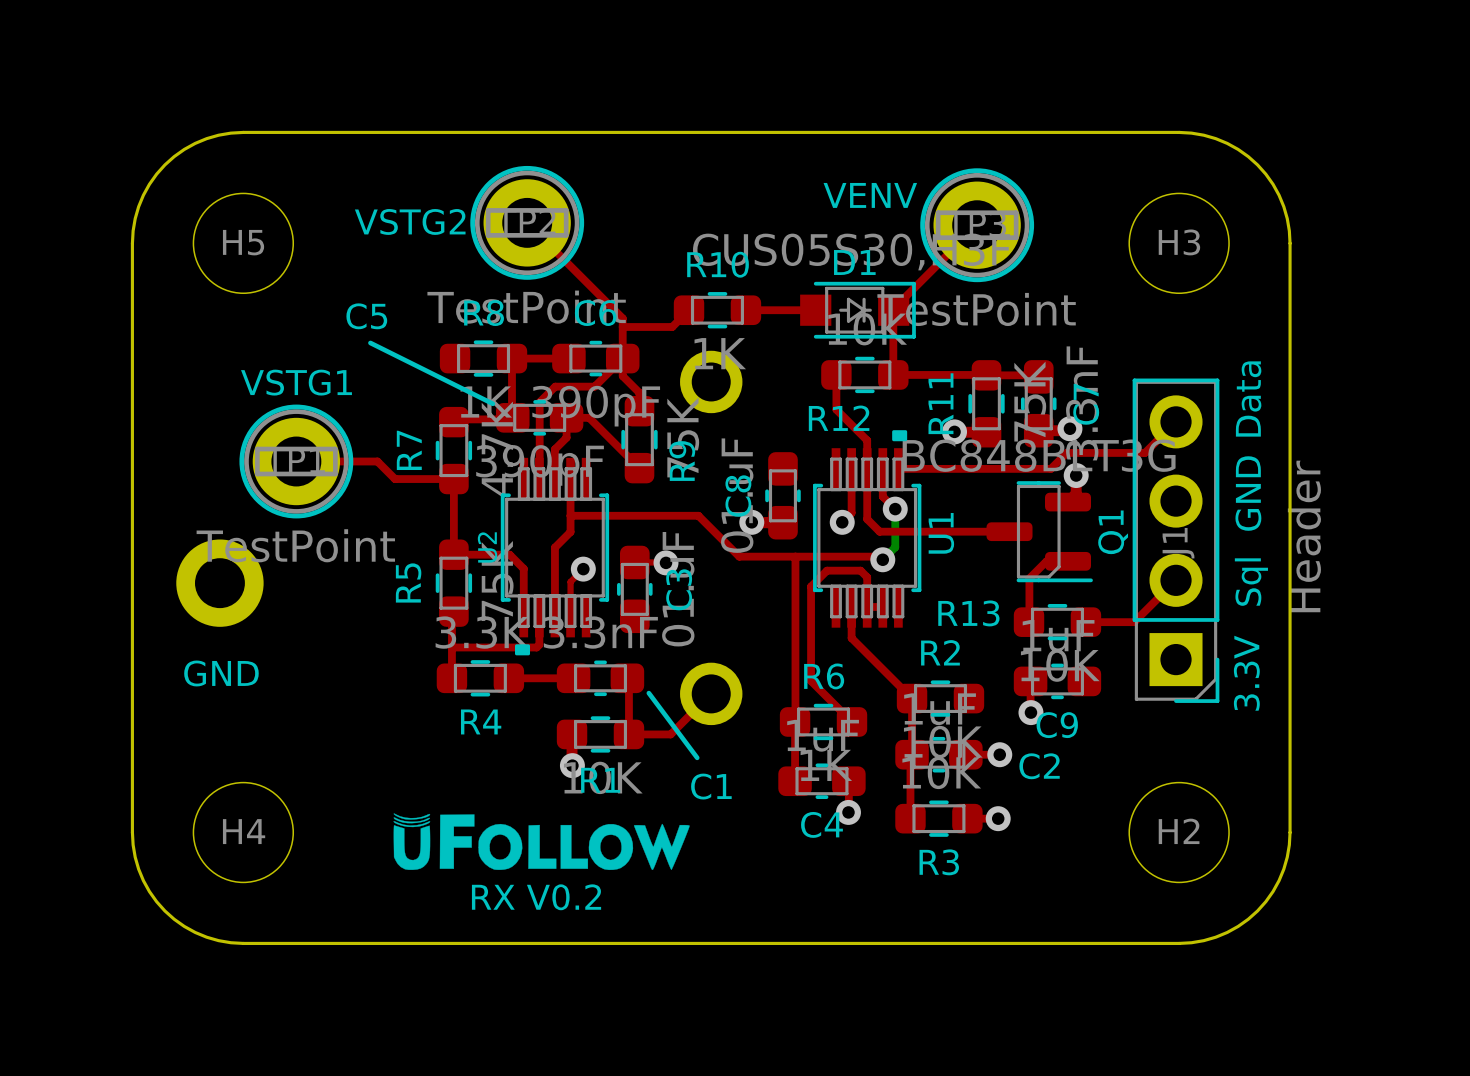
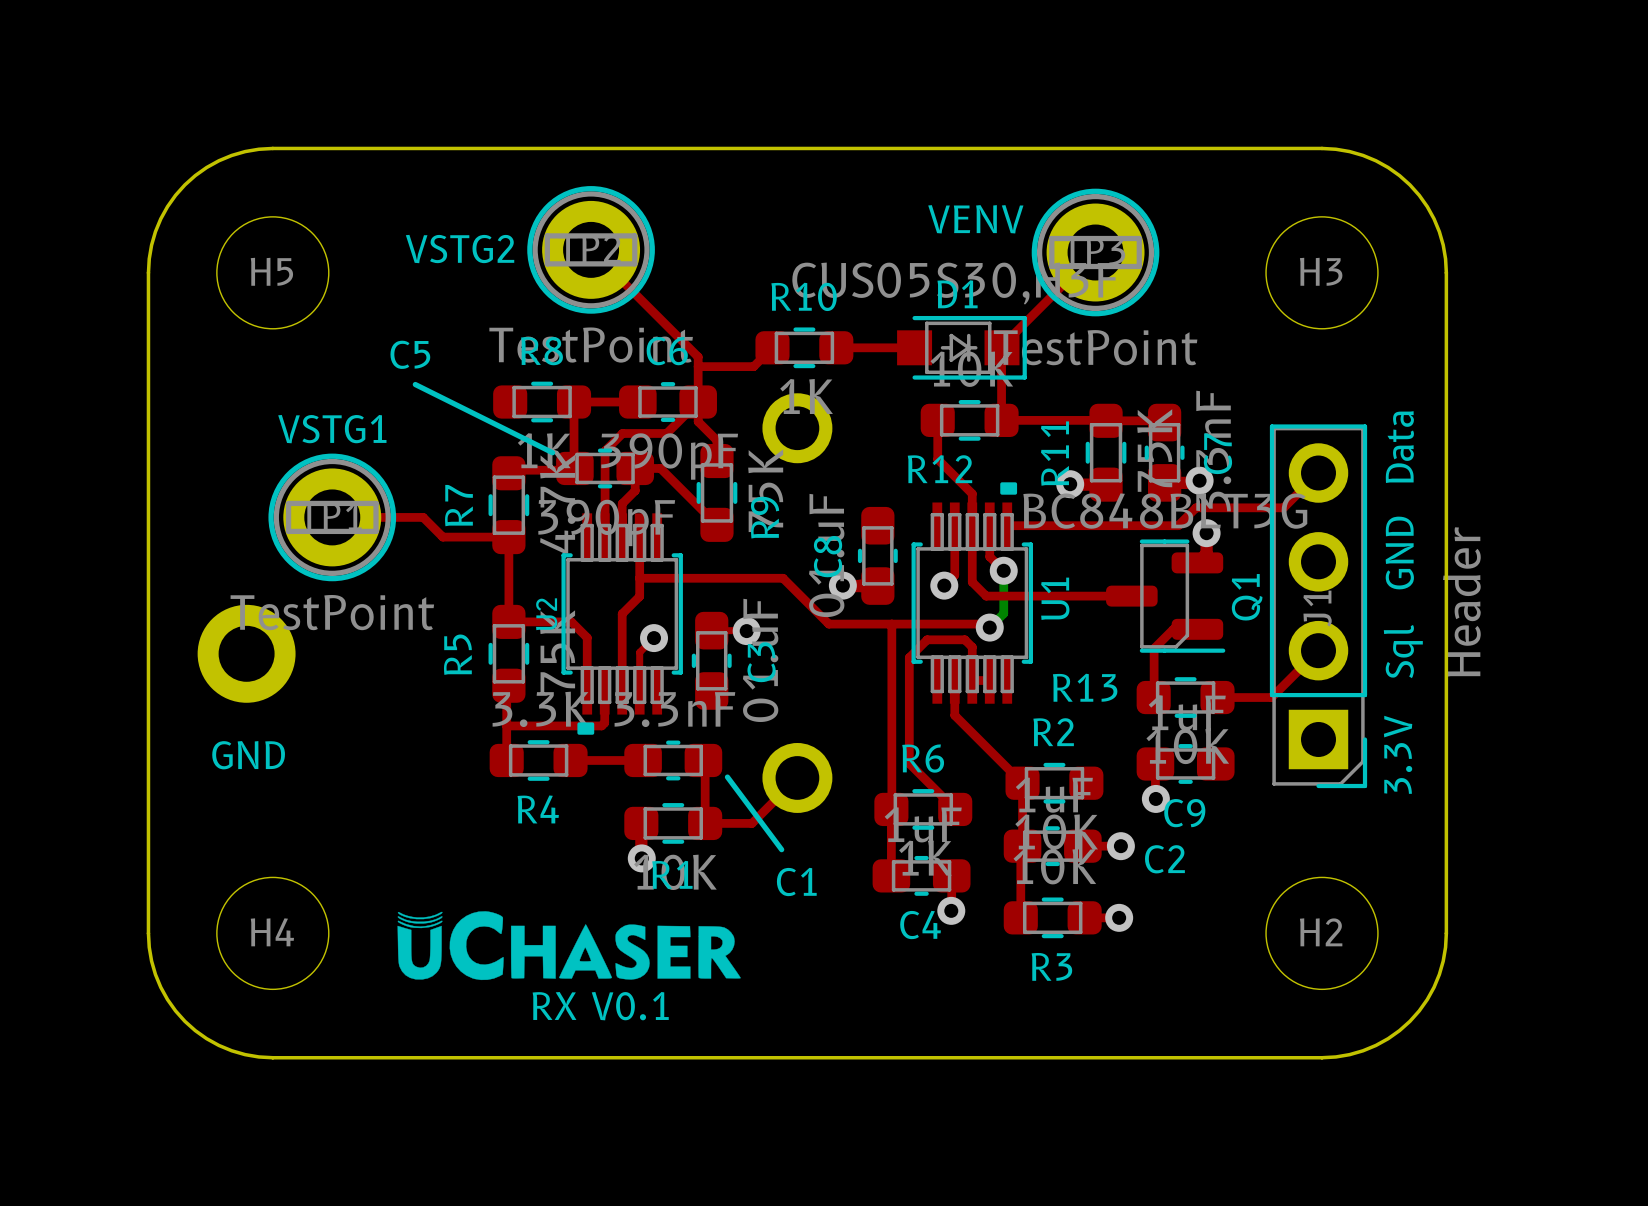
drawing: none -> [397, 911, 741, 981]
drawing: [393, 813, 690, 871] -> none
text: RX V0.2 (536, 897) -> RX V0.1 (600, 1006)

